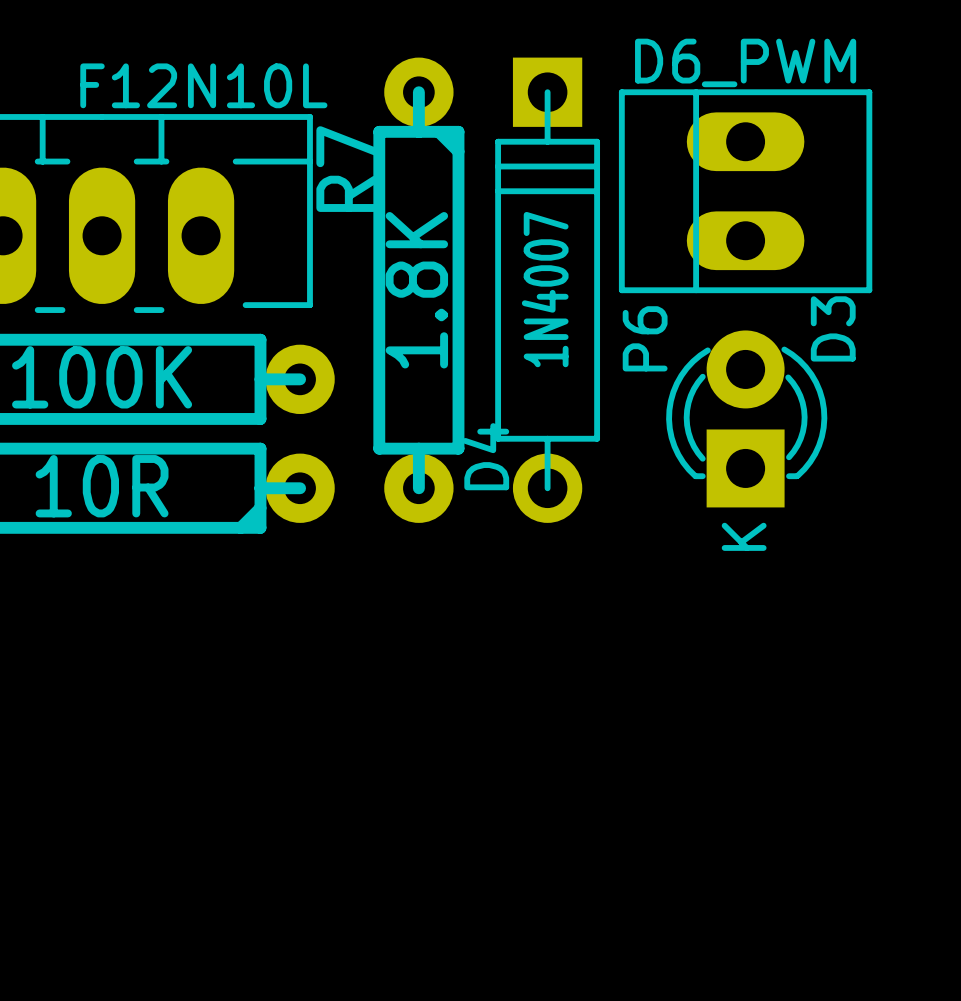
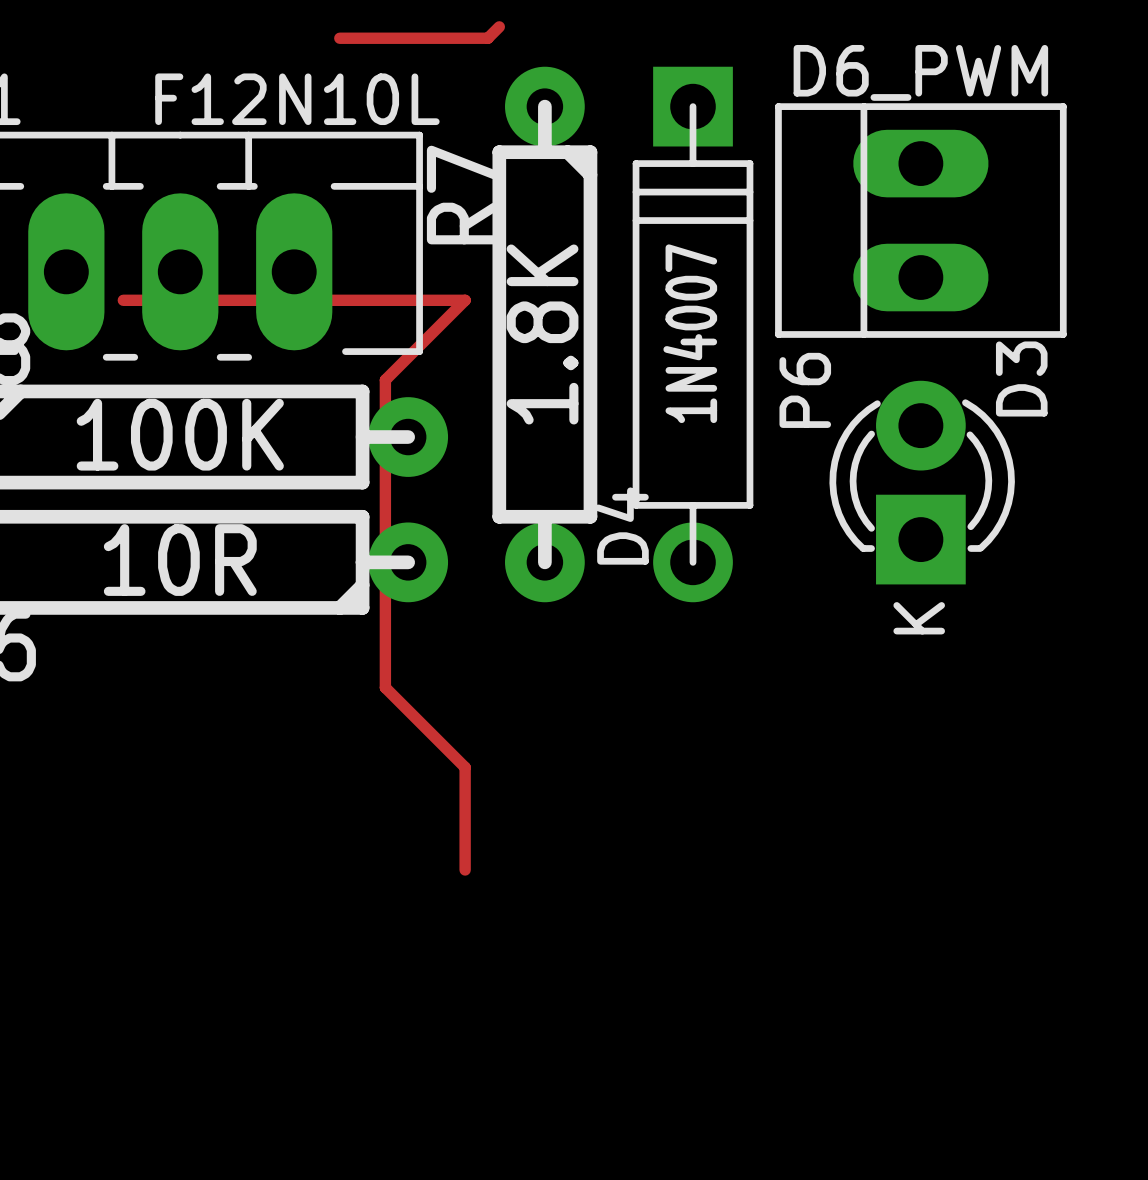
top track: none -> (499, 26) (487, 38) (339, 38)
top track: none -> (123, 300) (465, 300) (385, 380) (385, 687) (465, 767) (465, 869)

